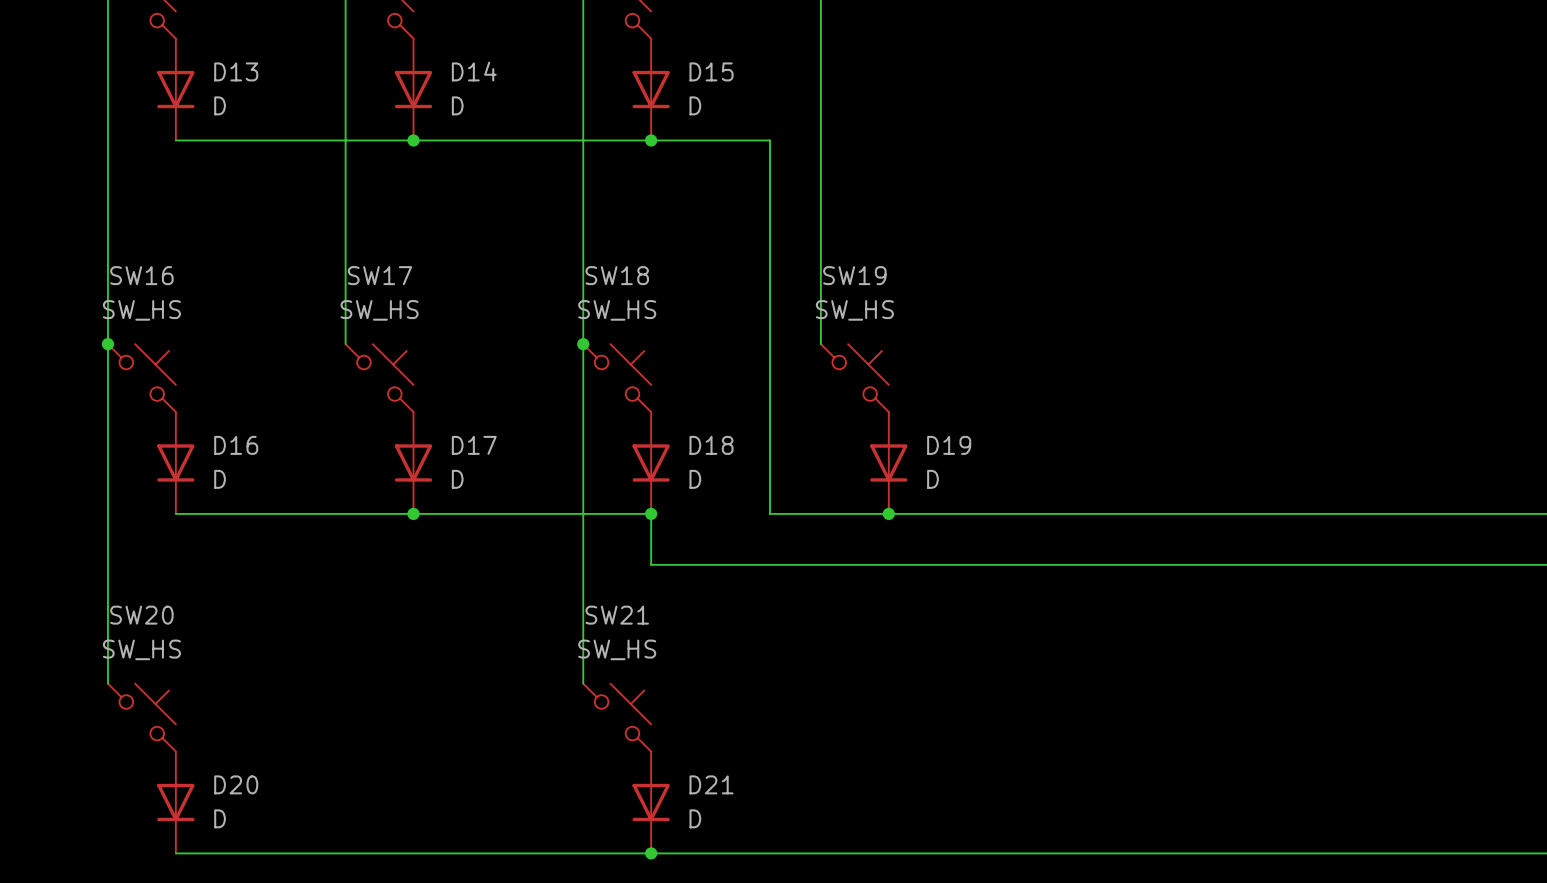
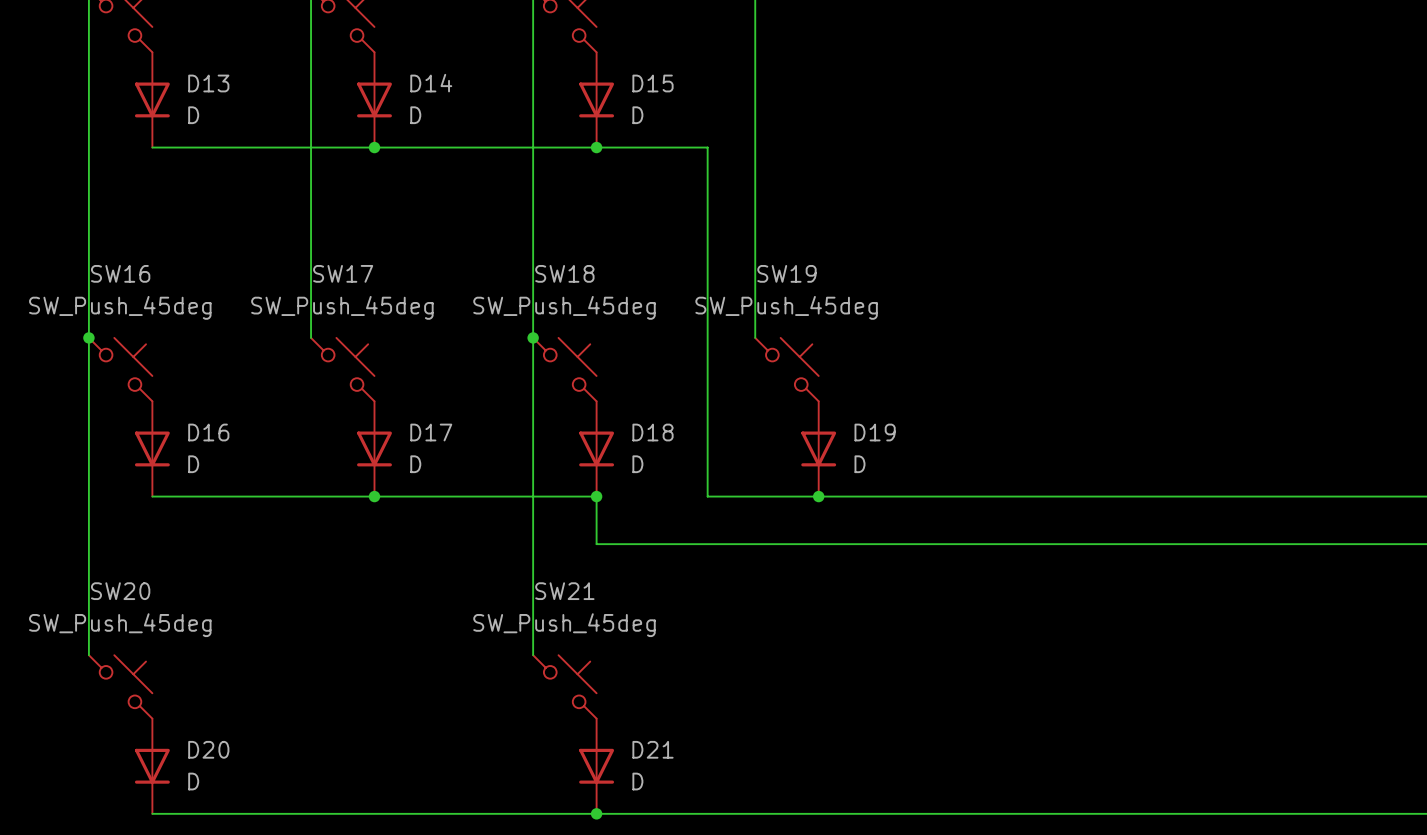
SW16 value: SW_HS (141, 310) -> SW_Push_45deg (120, 307)
SW17 value: SW_HS (379, 310) -> SW_Push_45deg (342, 307)
SW18 value: SW_HS (617, 310) -> SW_Push_45deg (564, 307)
SW19 value: SW_HS (854, 310) -> SW_Push_45deg (786, 307)
SW20 value: SW_HS (141, 649) -> SW_Push_45deg (120, 625)
SW21 value: SW_HS (617, 649) -> SW_Push_45deg (564, 625)

